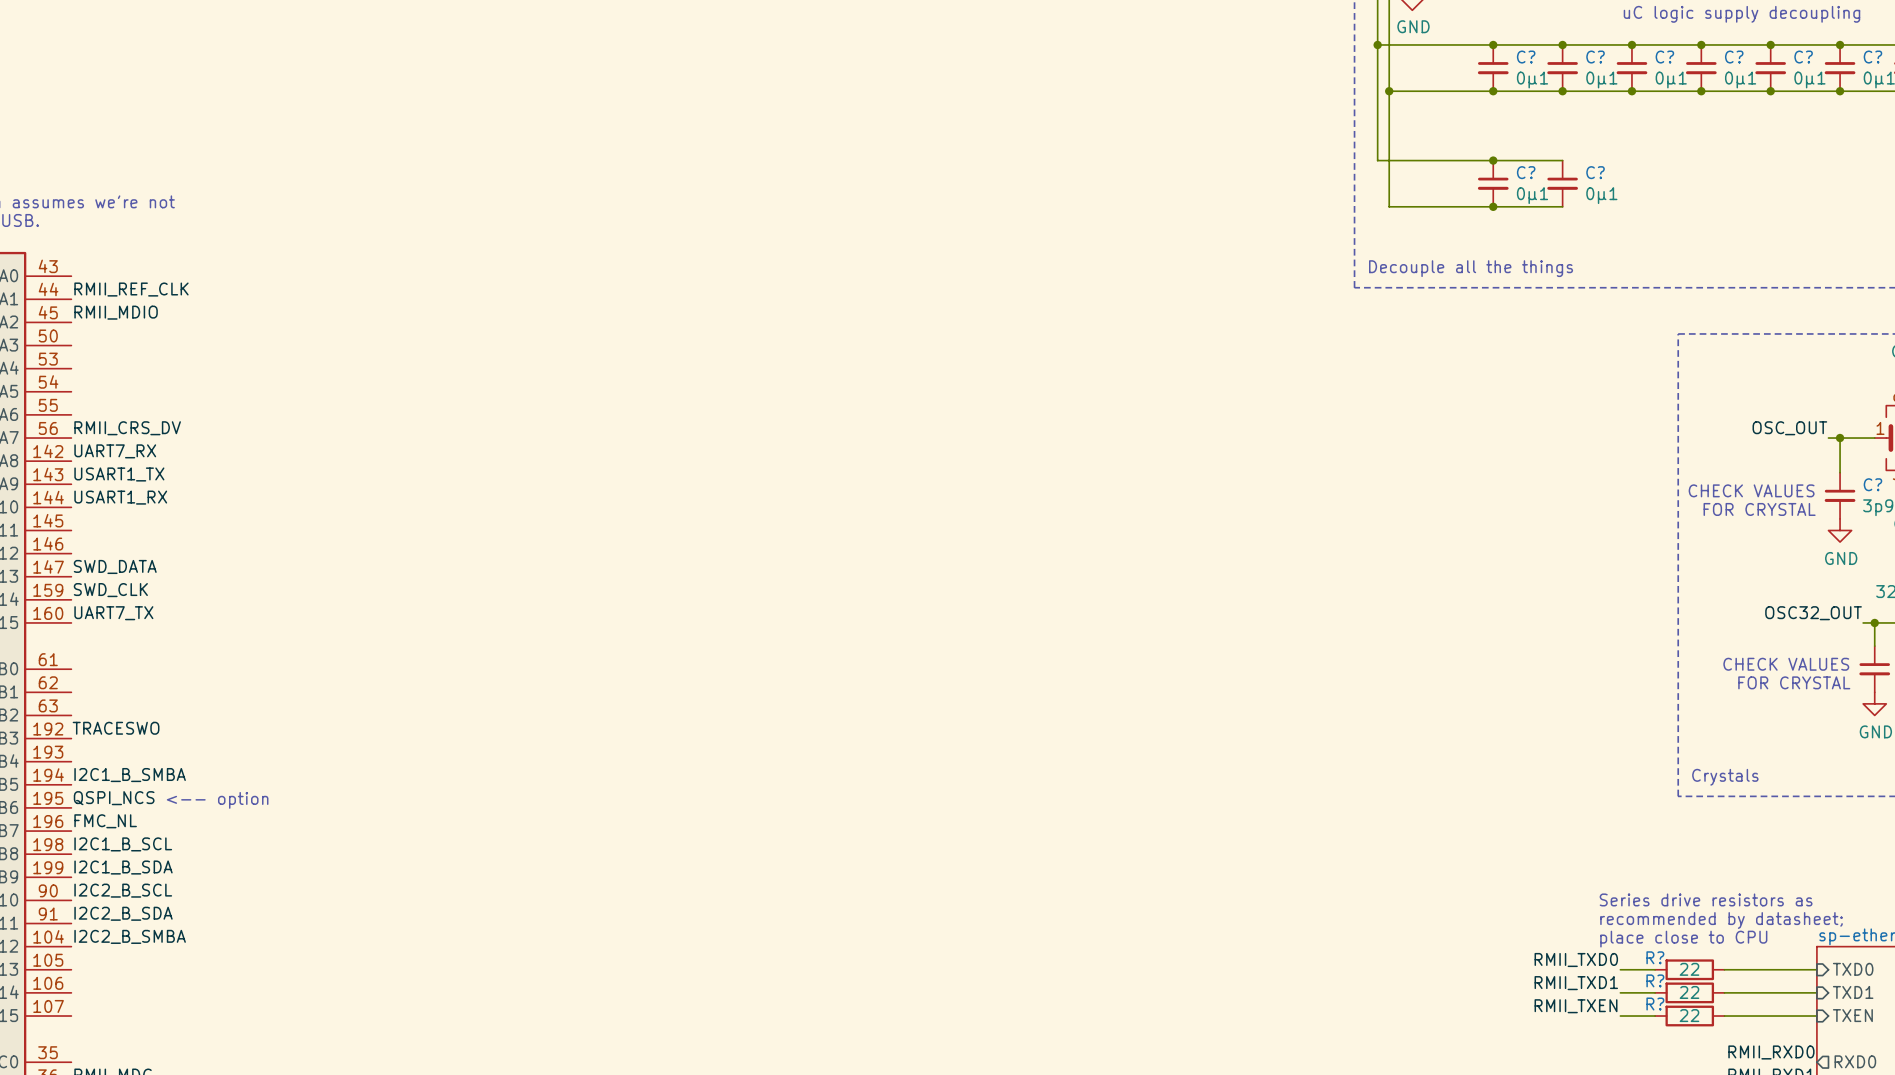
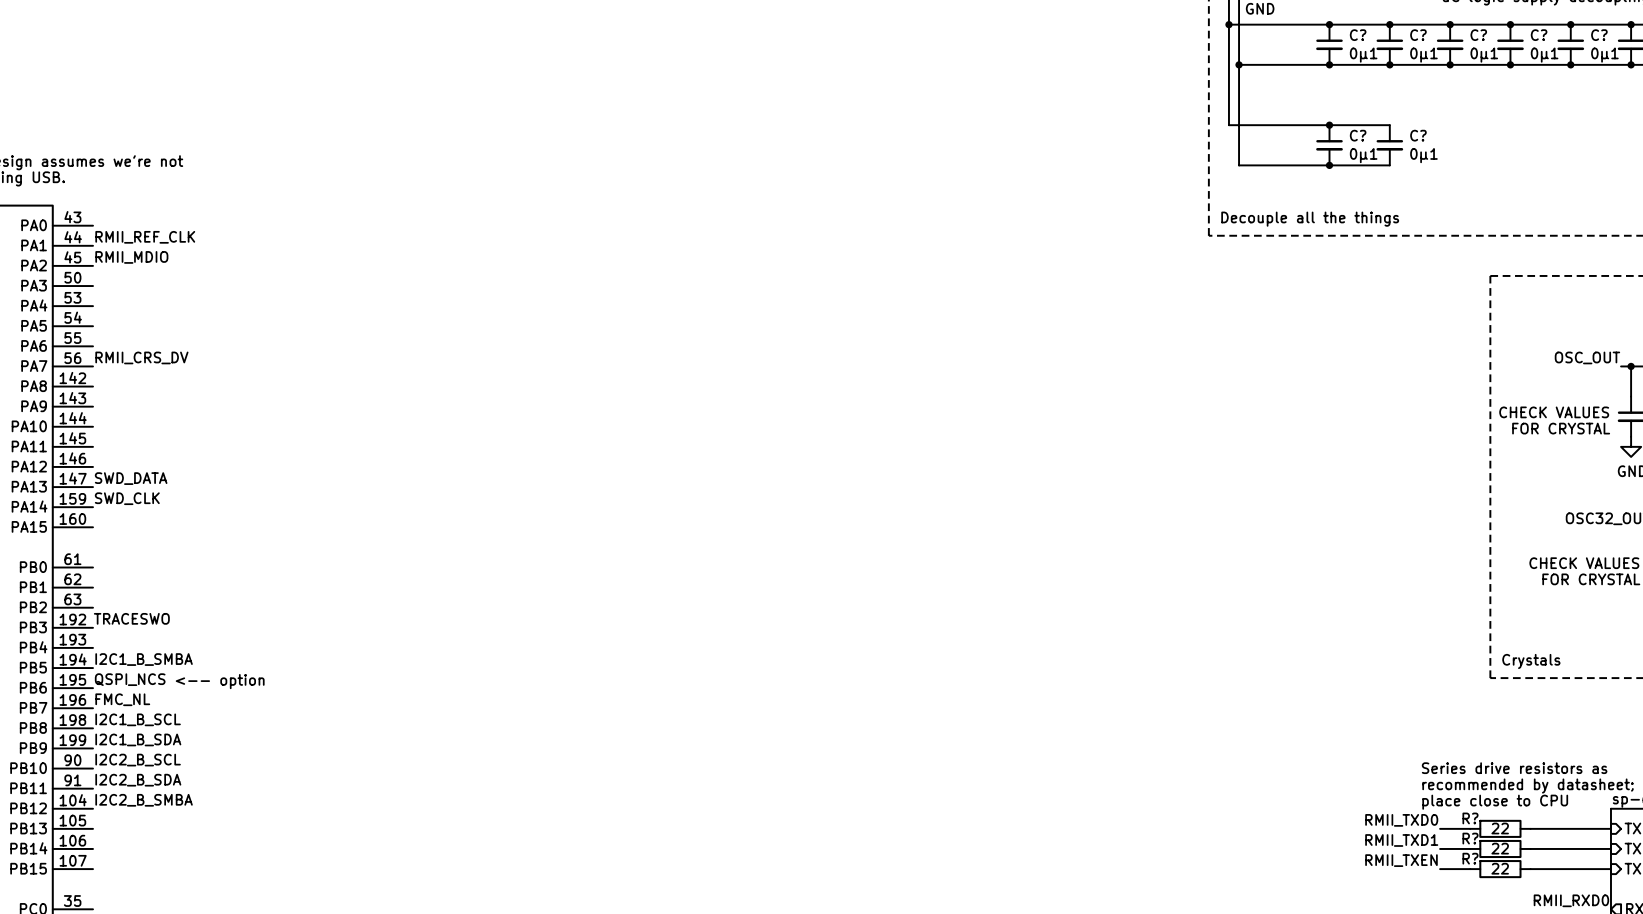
label: UART7_RX (115, 451) -> none
label: USART1_TX (119, 474) -> none
label: USART1_RX (120, 497) -> none
label: UART7_TX (113, 613) -> none

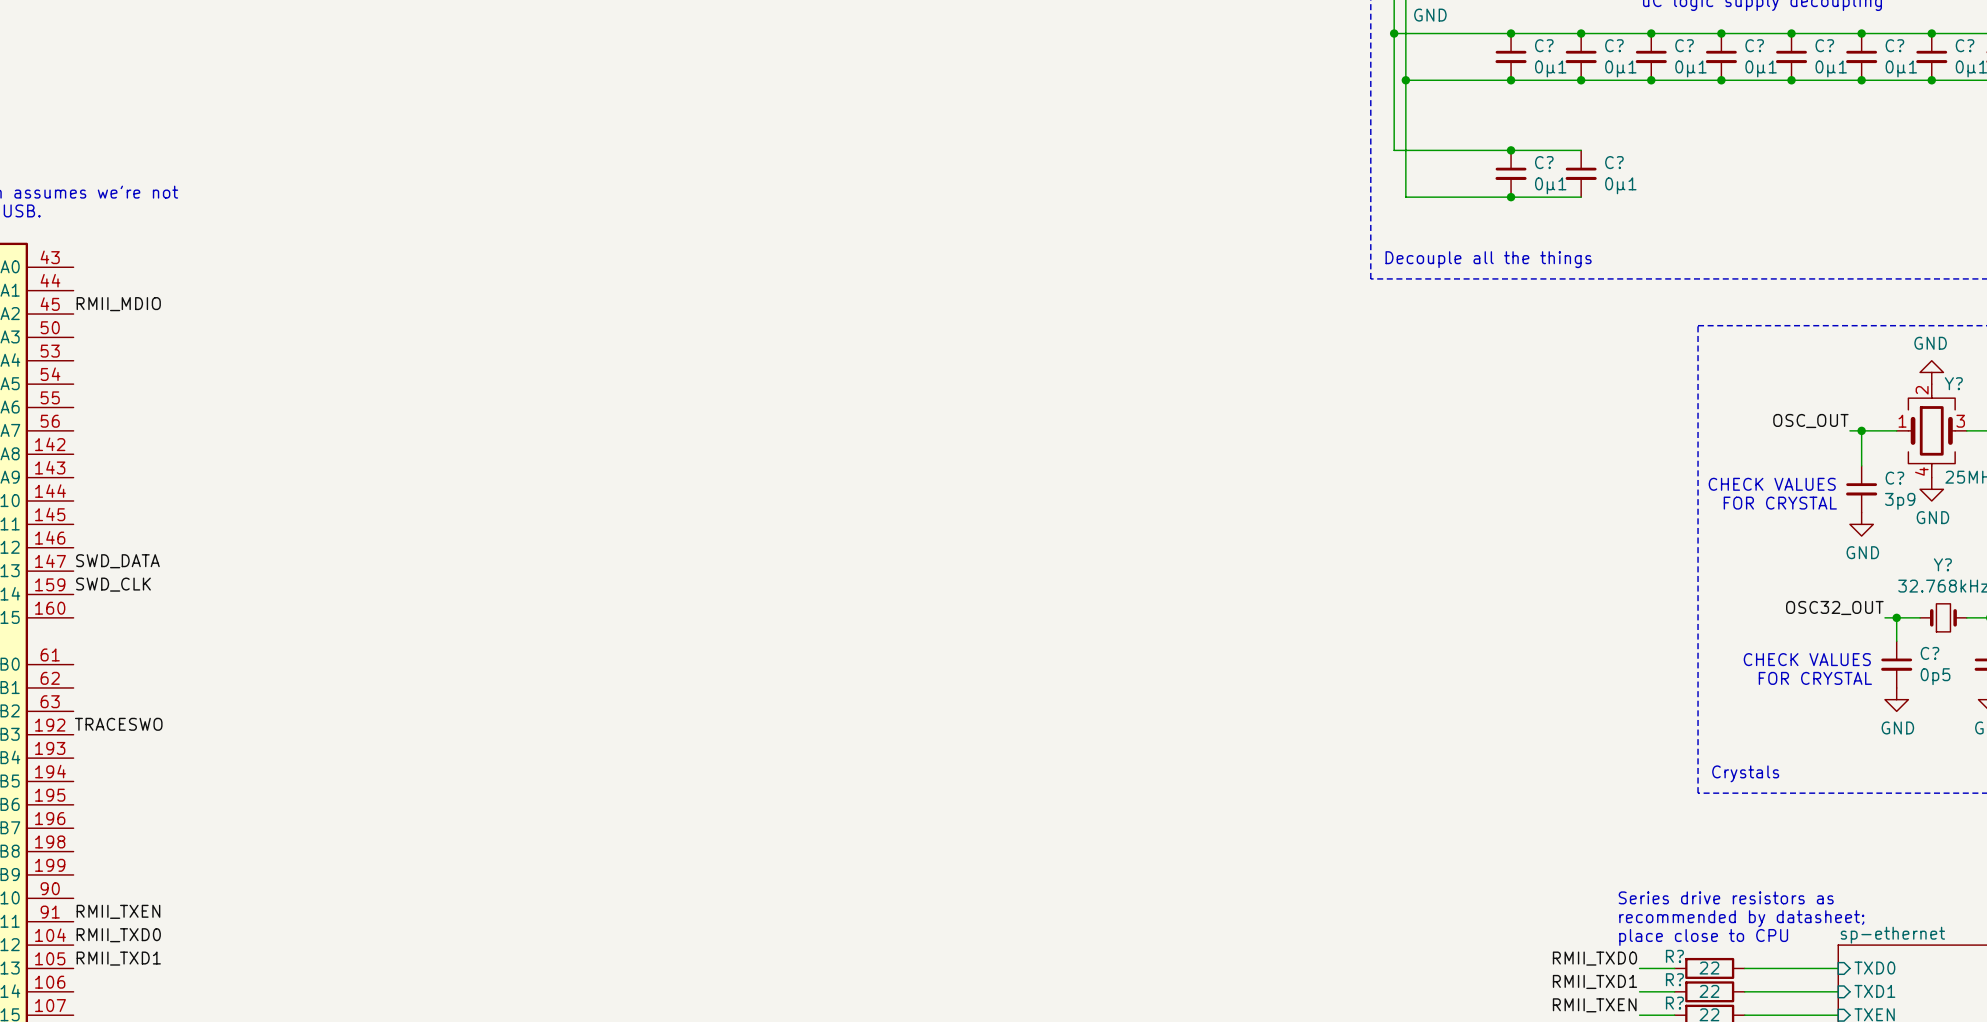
label: RMII_REF_CLK (145, 237) -> none
label: RMII_CRS_DV (141, 357) -> none
label: I2C1_B_SMBA (144, 659) -> none
label: QSPI_NCS (130, 679) -> none
text: <-- option (220, 681) -> none
label: FMC_NL (122, 699) -> none
label: I2C1_B_SCL (138, 719) -> none
label: I2C1_B_SDA (138, 739) -> none
label: I2C2_B_SCL (138, 760) -> none
label: I2C2_B_SDA (138, 780) -> RMII_TXEN (118, 911)
label: I2C2_B_SMBA (144, 800) -> RMII_TXD0 (118, 935)
label: none -> RMII_TXD1 (118, 958)

